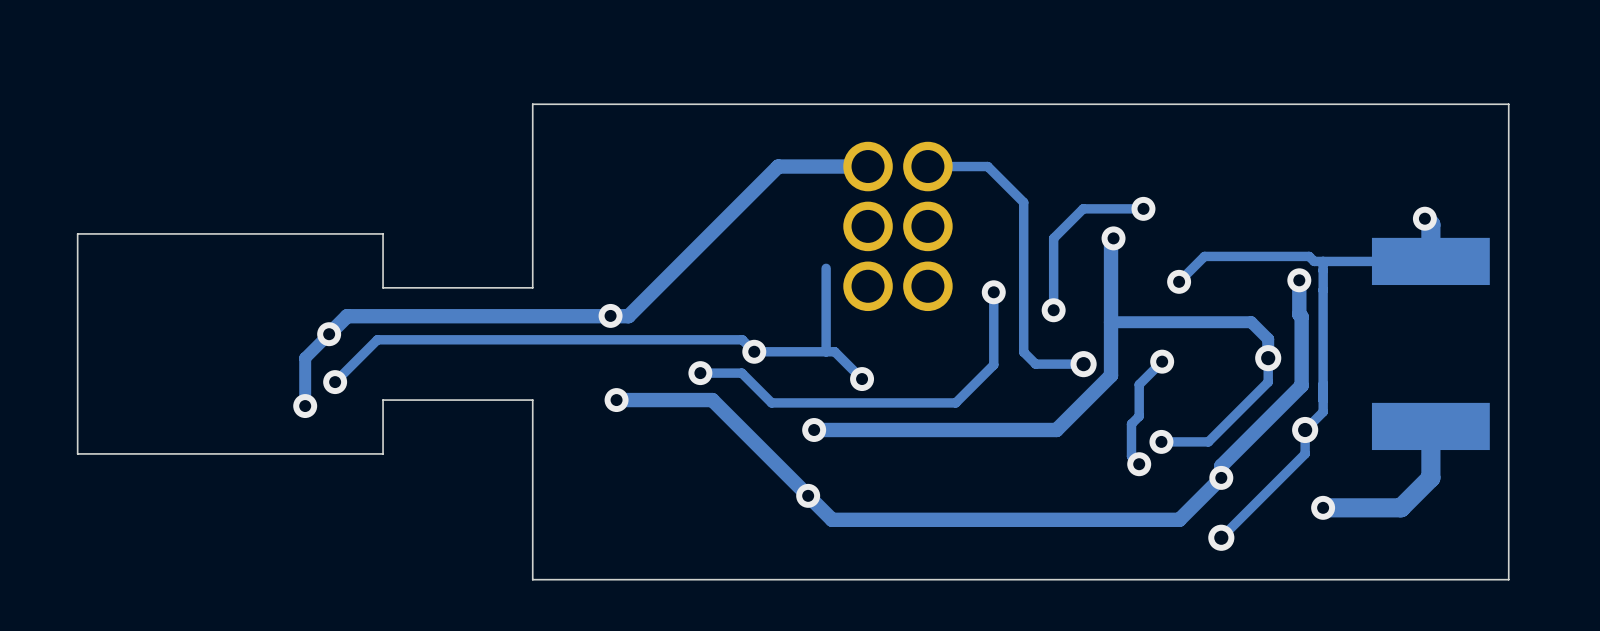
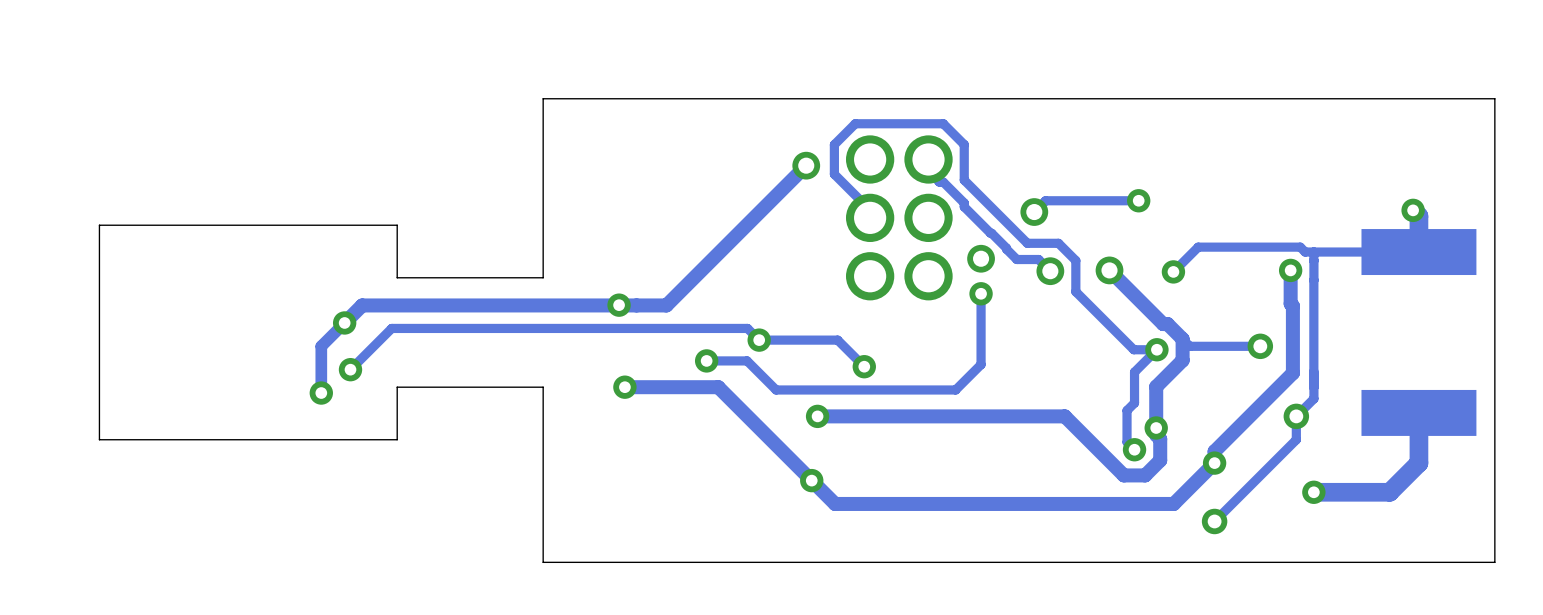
track: (868, 166) (778, 166) (628, 316) -> (806, 165) (666, 305) (636, 305)
track: (927, 166) (987, 166) (1023, 202) (1023, 352) (1035, 364) (1083, 364) -> (928, 159) (928, 171) (939, 182) (943, 182) (964, 203) (964, 206) (1016, 259) (1038, 259) (1050, 271)
via: none -> (806, 165)
track: (1083, 208) (1053, 238) (1053, 310) -> (1079, 200) (1045, 200) (1034, 212)
via: none -> (1034, 212)
track: none -> (870, 217) (870, 210) (834, 174) (834, 144) (855, 123) (943, 123) (964, 144) (964, 180) (1027, 243) (1058, 243) (1075, 260) (1075, 291) (1133, 349) (1156, 349)
track: (1113, 238) (1111, 240) (1111, 375) (1056, 429) -> (1182, 339) (1182, 360) (1156, 386) (1156, 435) (1160, 439) (1160, 460) (1145, 475) (1123, 475) (1064, 416) (1053, 416)
via: (1113, 238) -> none
track: (826, 268) (826, 351) -> none
via: none -> (981, 258)
track: none -> (1109, 270) (1163, 324) (1167, 324) (1182, 339)
via: none -> (1109, 270)
via: none -> (1050, 271)
track: (993, 292) (993, 364) (981, 376) -> (981, 293) (981, 364)
via position: (993, 292) -> (981, 293)
via: (1053, 310) -> none
track: (1111, 322) (1251, 322) (1268, 339) (1268, 382) (1208, 441) (1161, 441) -> none
track: none -> (1182, 339) (1189, 346) (1260, 346)
via: (1083, 364) -> none

